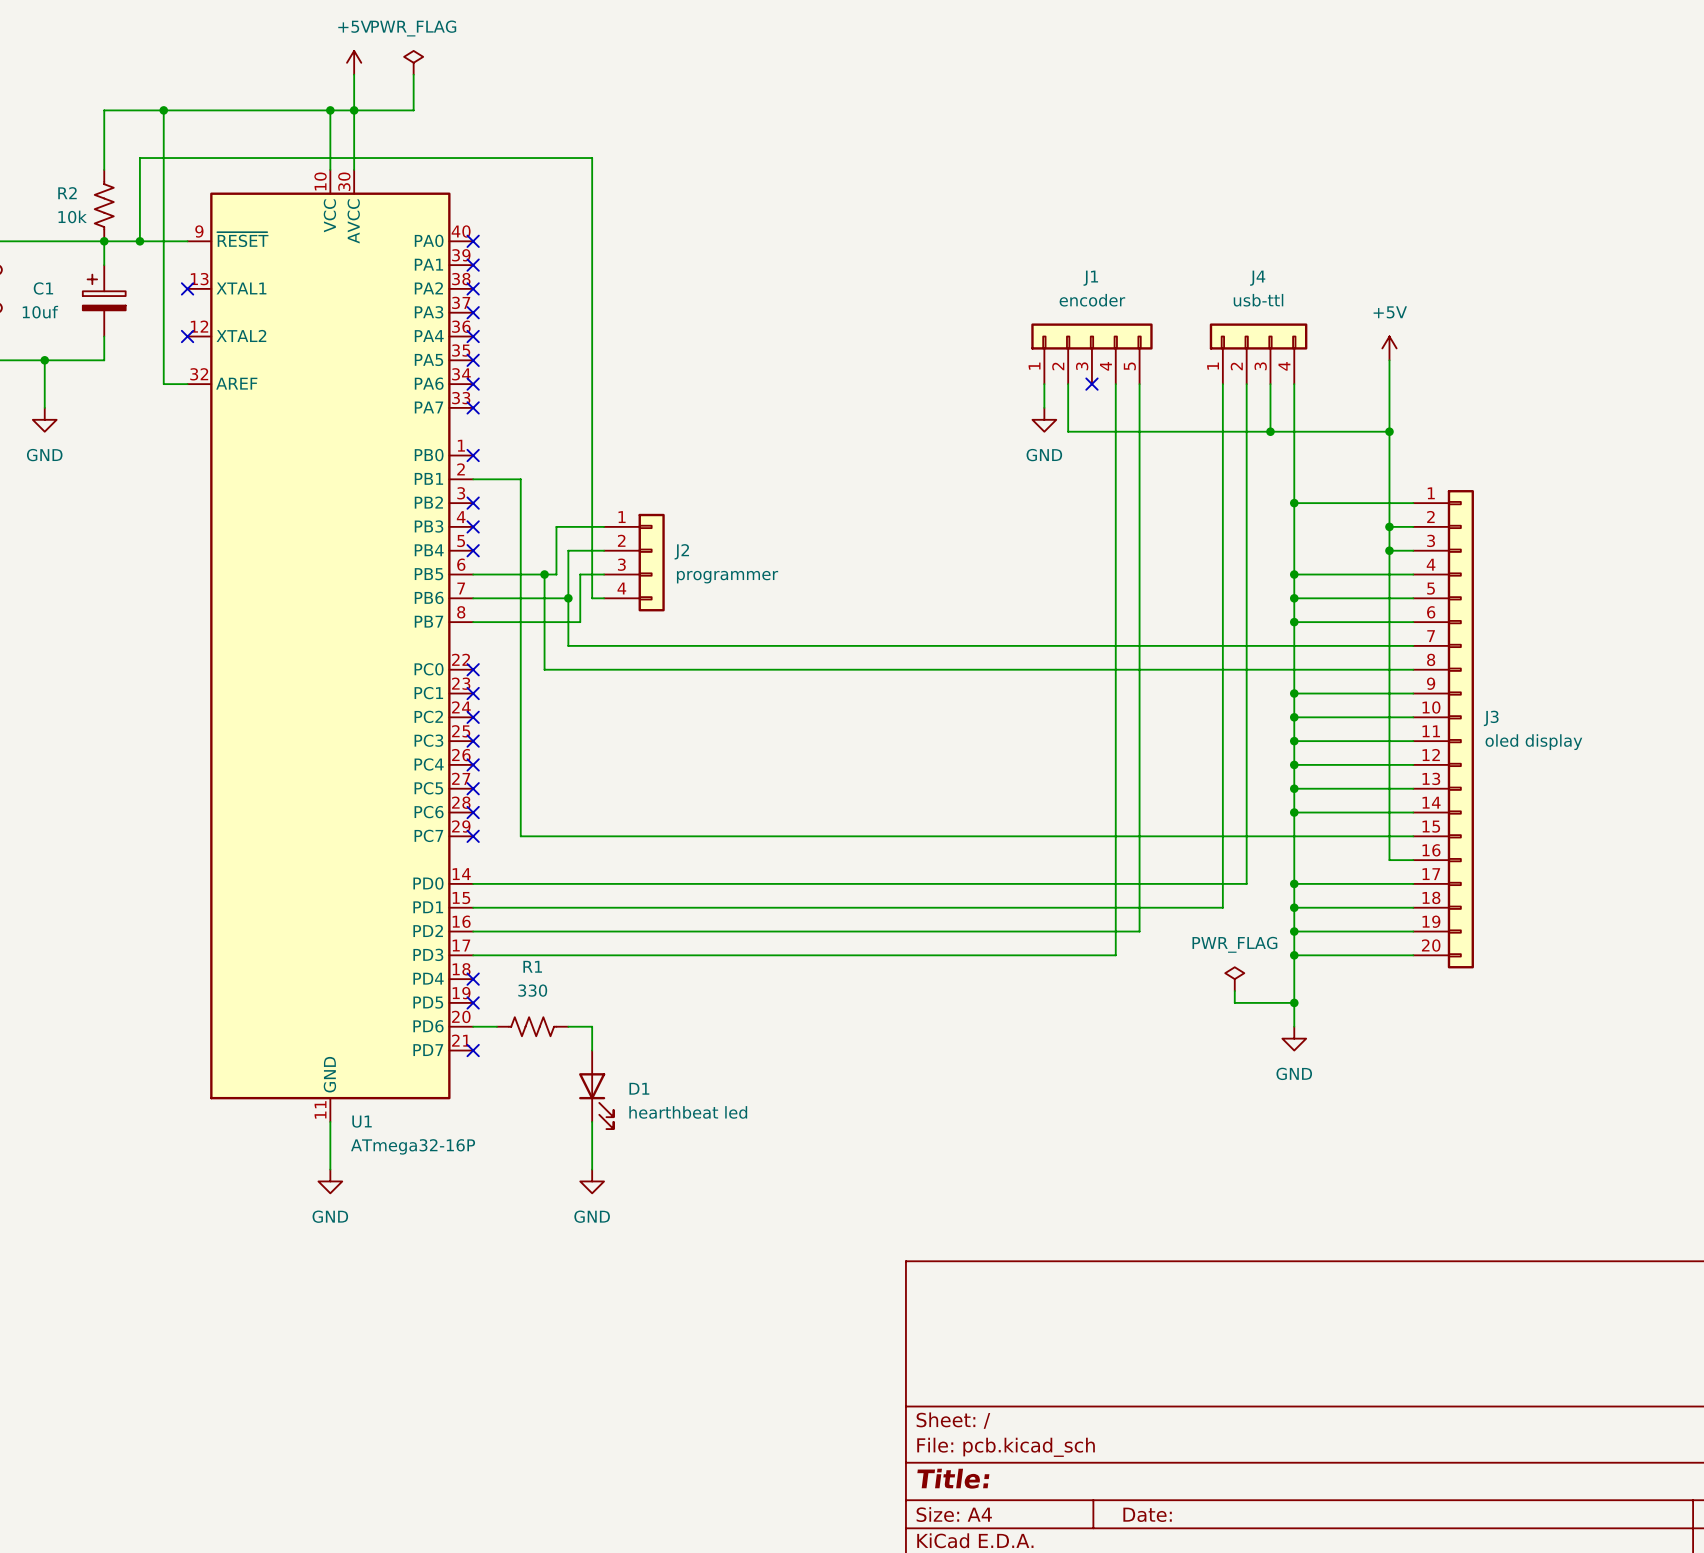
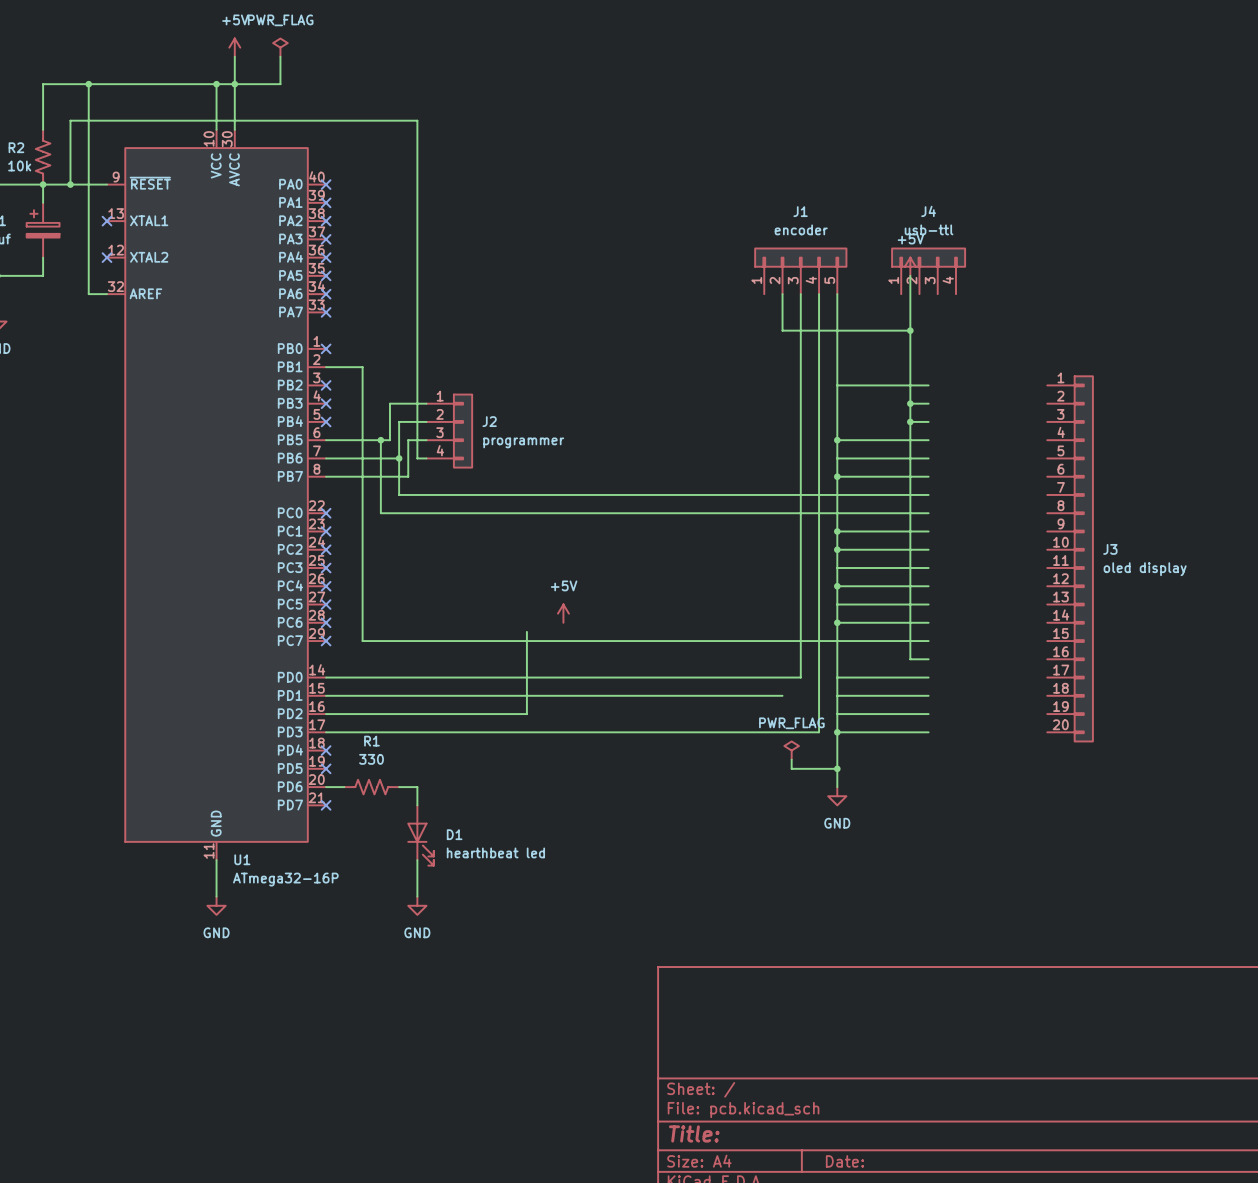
power symbol position: +5V (1389, 348) -> +5V (910, 266)
wire: (1389, 360) (1389, 860) (1413, 860) -> (910, 275) (910, 659) (928, 659)
wire: (1044, 384) (1044, 407) -> none
no-connect mark: (1091, 384) -> none
wire: (1222, 384) (1222, 907) -> (928, 695) (901, 695)
wire: (1246, 384) (1246, 883) -> (928, 677) (919, 677)
wire: (1270, 384) (1270, 431) -> none
wire: (1294, 384) (1294, 1026) -> none
power symbol: GND (1044, 419) -> none
wire: (1234, 431) (1389, 431) -> none
junction position: (1270, 431) -> (910, 330)
junction: (1389, 431) -> none
wire: (1294, 503) (1413, 503) -> (837, 385) (928, 385)
junction: (1294, 503) -> none
junction: none -> (910, 403)
wire: (1389, 526) (1413, 526) -> (910, 403) (928, 403)
junction: (1389, 526) -> none
junction: none -> (910, 421)
wire: (1389, 550) (1413, 550) -> (910, 421) (928, 421)
junction: (1389, 550) -> none
junction: none -> (837, 440)
wire: (1294, 574) (1413, 574) -> (837, 440) (928, 440)
junction: (1294, 574) -> none
wire: (1294, 598) (1413, 598) -> (837, 458) (928, 458)
junction: (1294, 598) -> none
junction: none -> (837, 476)
wire: (1294, 622) (1413, 622) -> (837, 476) (928, 476)
junction: (1294, 622) -> none
wire: (1258, 645) (1413, 645) -> none
wire: (1258, 669) (1413, 669) -> none
junction: none -> (837, 531)
wire: (1294, 693) (1413, 693) -> (837, 531) (928, 531)
junction: (1294, 693) -> none
junction: none -> (837, 549)
wire: (1294, 717) (1413, 717) -> (837, 549) (928, 549)
junction: (1294, 717) -> none
wire: (1294, 741) (1413, 741) -> (837, 568) (928, 568)
junction: (1294, 741) -> none
junction: none -> (837, 586)
wire: (1294, 764) (1413, 764) -> (837, 586) (928, 586)
junction: (1294, 764) -> none
wire: (1294, 788) (1413, 788) -> (837, 604) (928, 604)
junction: (1294, 788) -> none
power symbol: none -> +5V (563, 613)
junction: none -> (837, 622)
wire: (1294, 812) (1413, 812) -> (837, 622) (928, 622)
junction: (1294, 812) -> none
wire: (1258, 836) (1413, 836) -> none
wire: (1091, 883) (1139, 883) -> (800, 677) (800, 294)
wire: (1294, 883) (1413, 883) -> none
junction: (1294, 883) -> none
wire: (1068, 907) (1139, 907) -> none
wire: (1294, 907) (1413, 907) -> none
junction: (1294, 907) -> none
wire: (734, 931) (1139, 931) -> (526, 714) (526, 631)
wire: none -> (928, 714) (837, 714) (837, 787)
wire: (1294, 931) (1413, 931) -> none
junction: (1294, 931) -> none
junction: none -> (837, 732)
wire: (1294, 955) (1413, 955) -> (837, 732) (928, 732)
junction: (1294, 955) -> none
power symbol position: PWR_FLAG (1234, 979) -> PWR_FLAG (791, 750)
wire: (1234, 991) (1234, 1002) (1294, 1002) -> (791, 759) (791, 768) (837, 768)
junction: none -> (837, 768)
junction: (1294, 1002) -> none
power symbol position: GND (1294, 1038) -> GND (837, 796)

